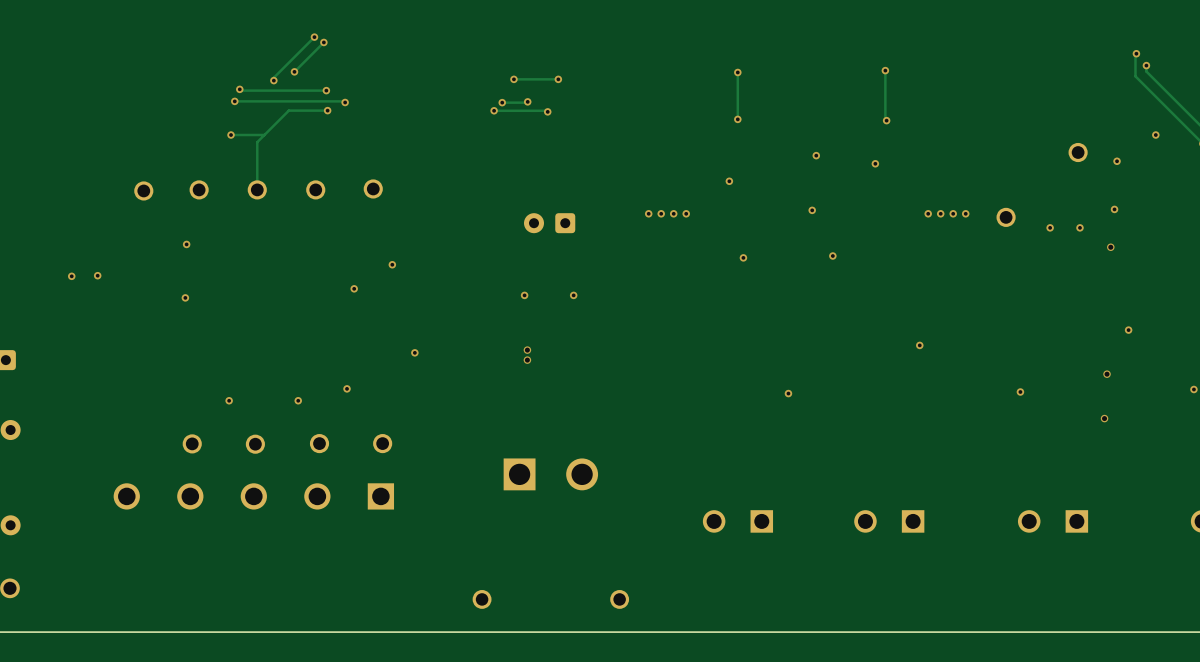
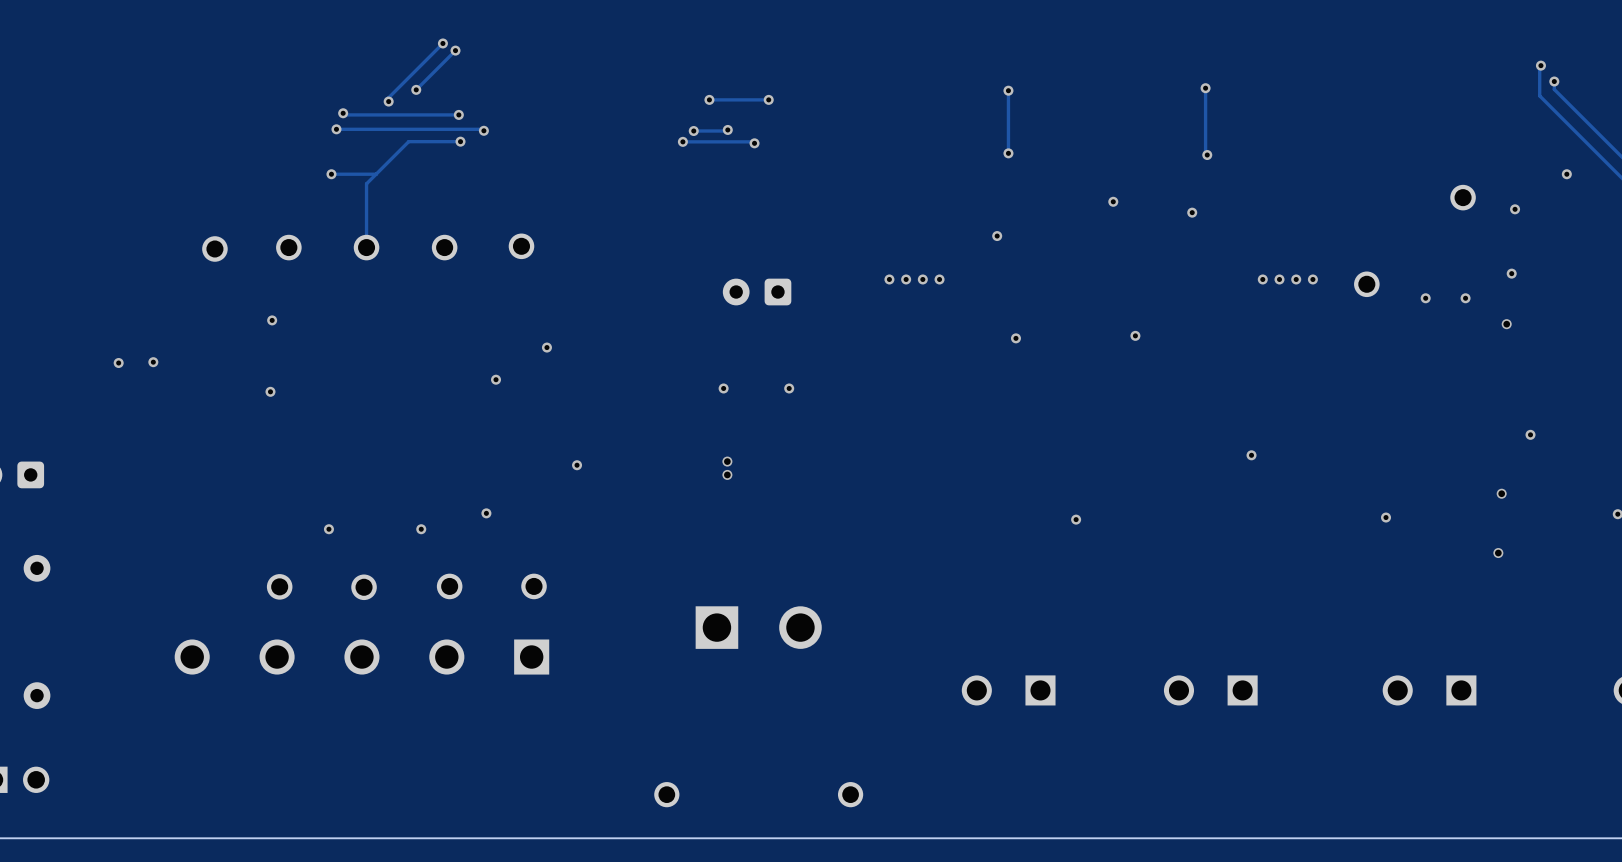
via: (812, 210) -> none

